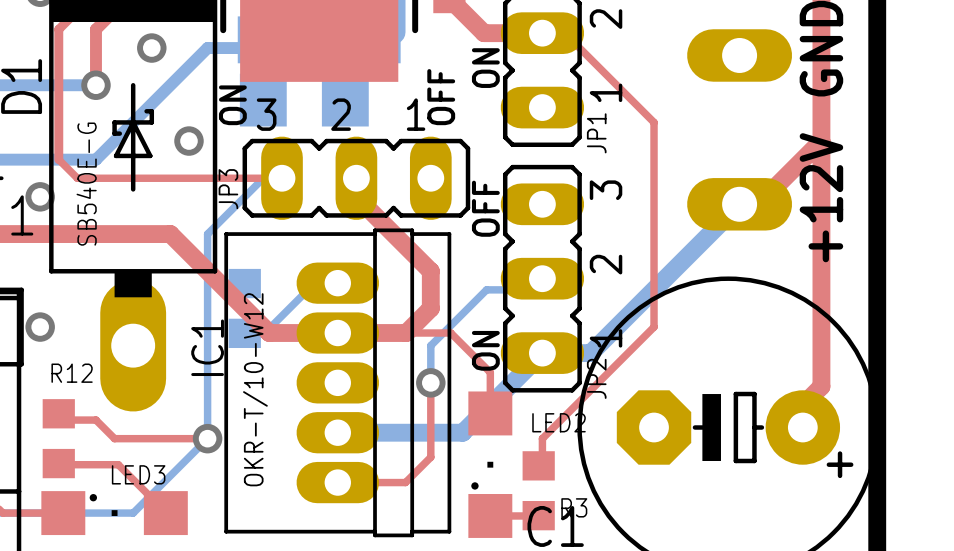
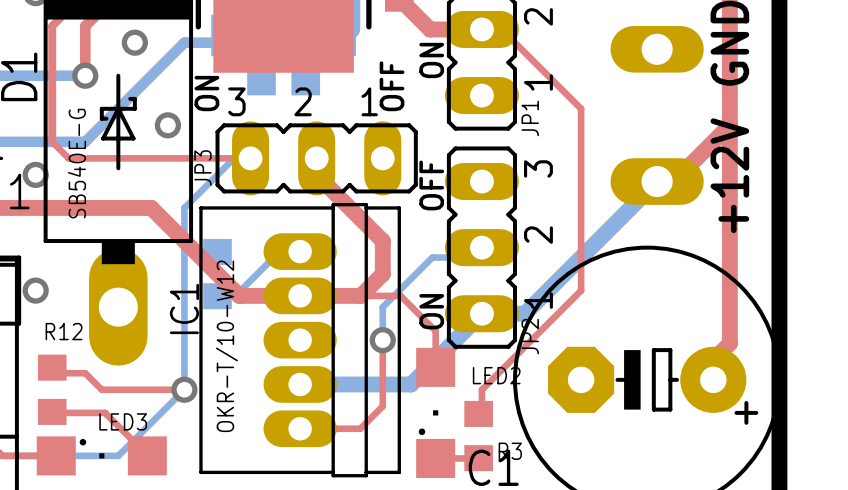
part footprint: [239, 73, 369, 127] -> [247, 69, 321, 96]

